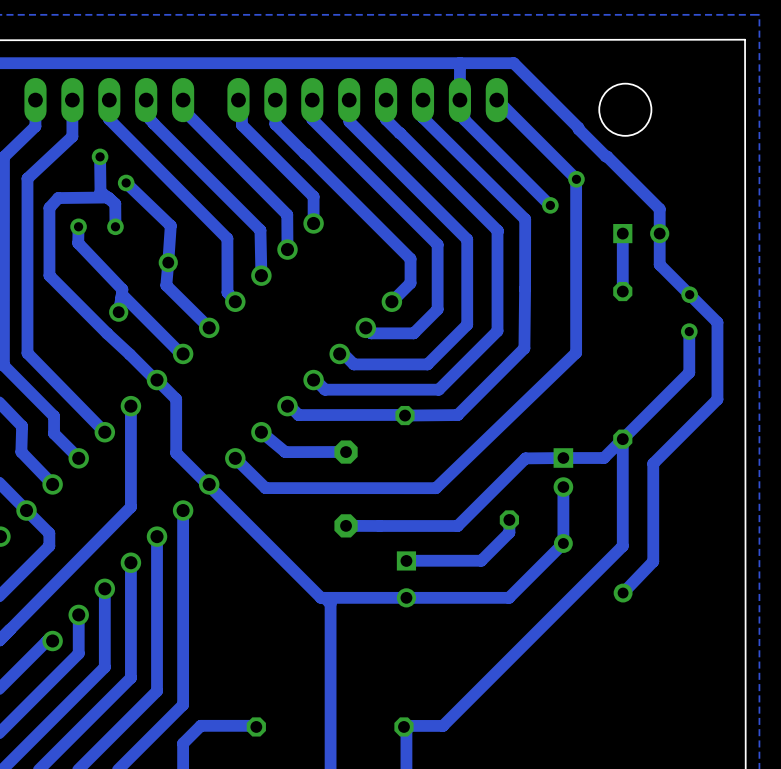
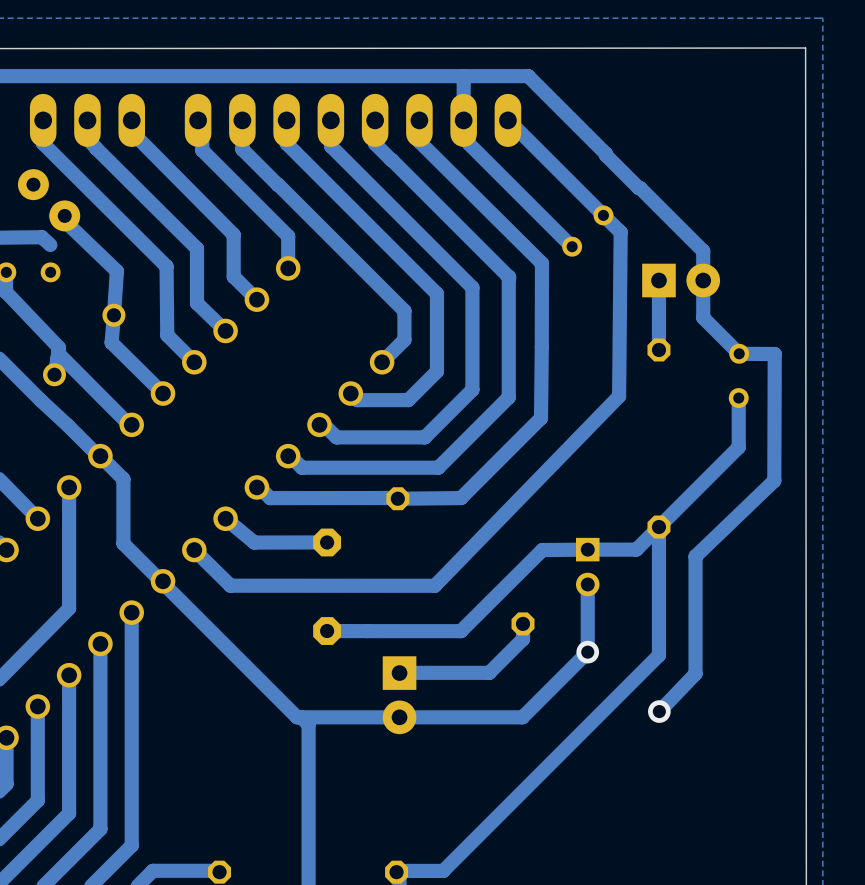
round board edge: [599, 83, 652, 136] -> none
track: (185, 111) (287, 214) (287, 249) -> (134, 134) (233, 234) (233, 276) (256, 299)
track: (109, 119) (227, 238) (227, 292) (235, 301) -> (42, 143) (166, 266) (167, 335) (194, 362)
track: (153, 123) (260, 230) (261, 275) -> (96, 148) (197, 248) (196, 303) (225, 330)
part footprint: [91, 148, 135, 192] -> [17, 169, 81, 232]
track: (100, 156) (100, 191) (115, 203) (115, 226) -> none
track: (576, 179) (576, 352) (435, 488) -> (603, 215) (620, 232) (619, 396) (434, 585)
part footprint: [613, 223, 670, 244] -> [642, 263, 721, 298]
track: (689, 294) (717, 322) (717, 399) (653, 463) -> (739, 353) (774, 354) (774, 480) (695, 556)
part footprint: [396, 551, 417, 608] -> [382, 656, 417, 735]

